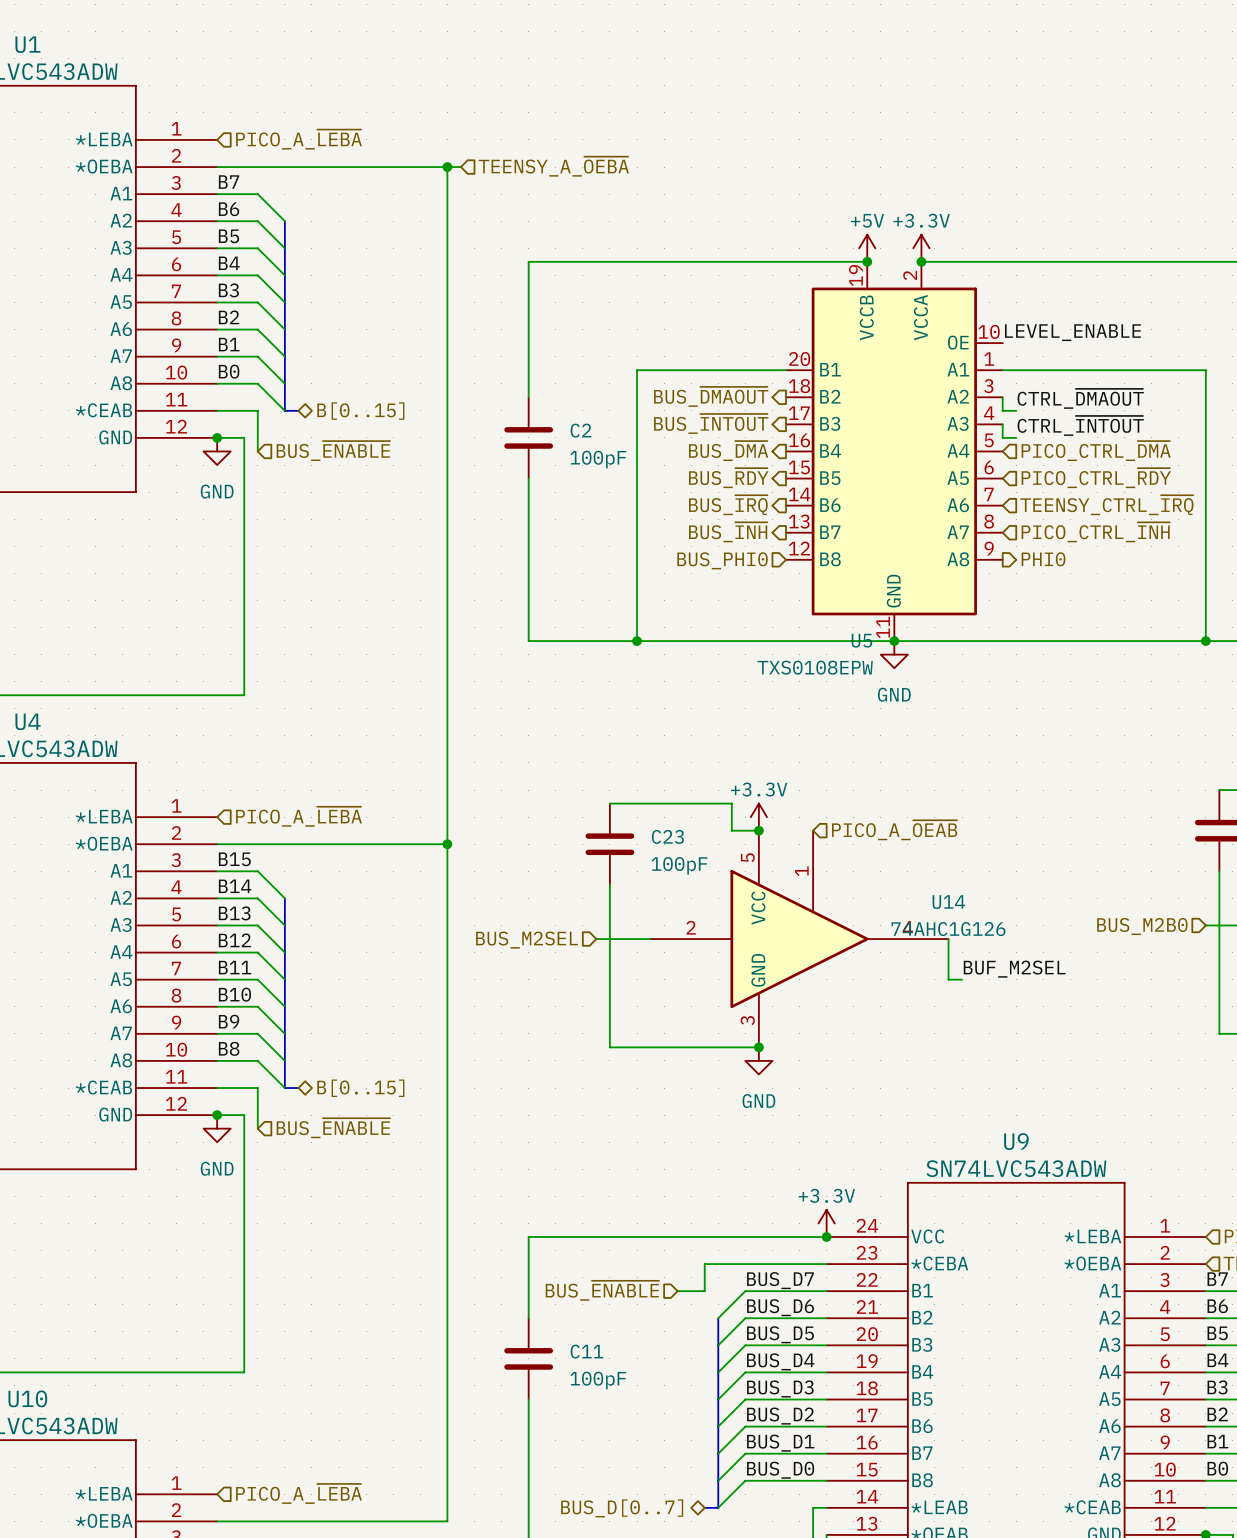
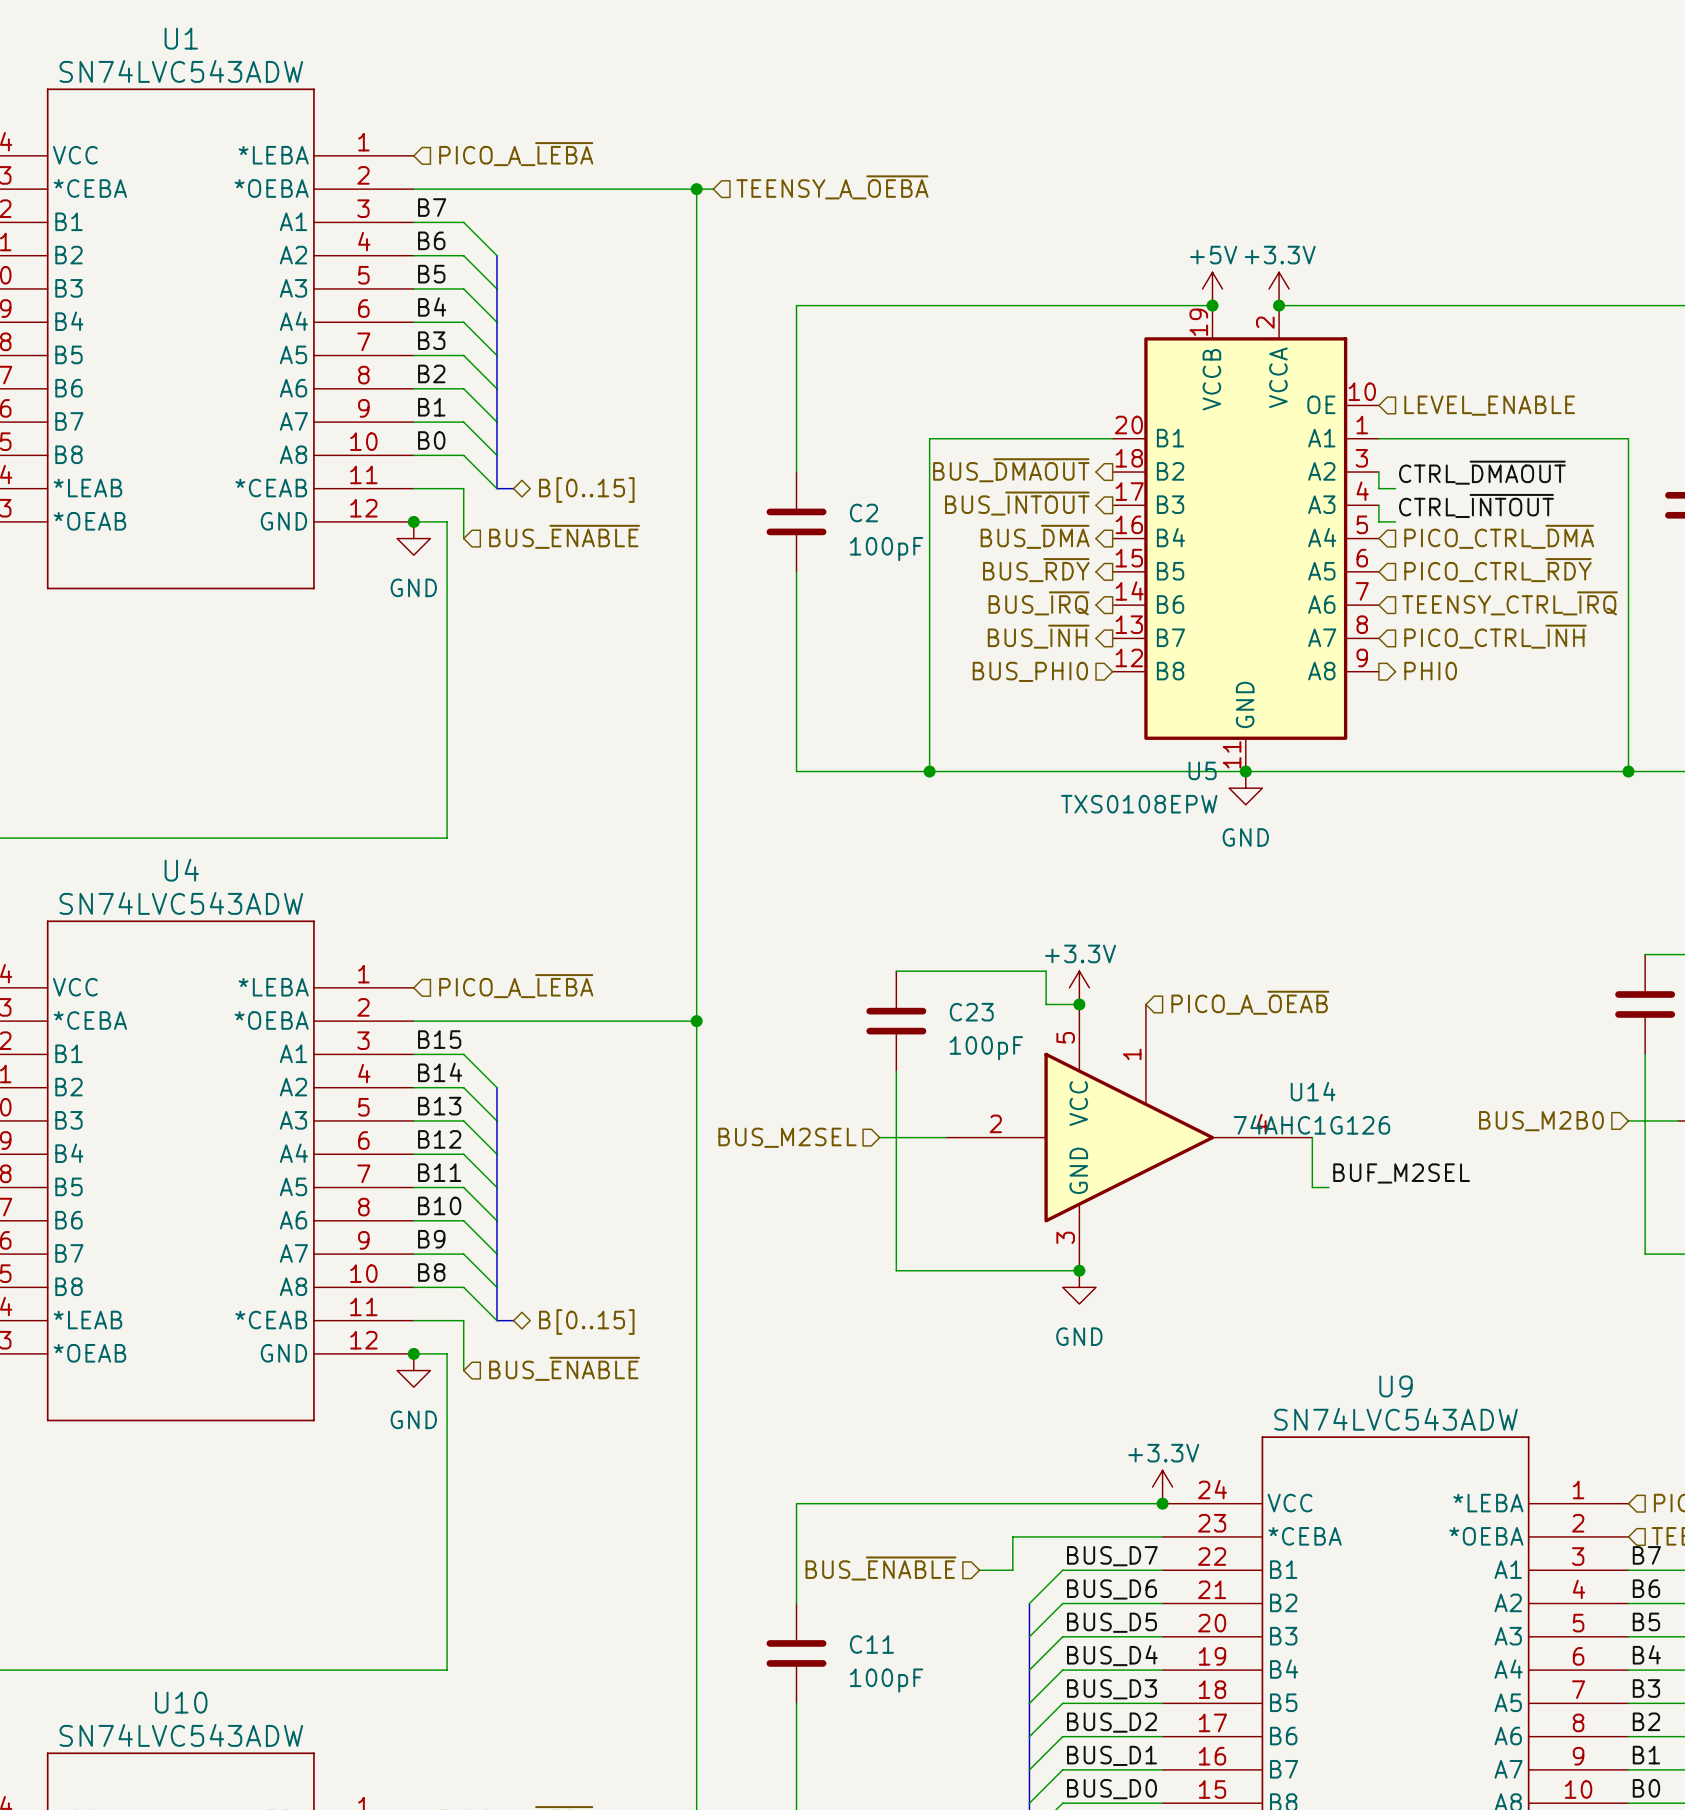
label: LEVEL_ENABLE (1072, 332) -> none
hierarchical label: none -> LEVEL_ENABLE (1489, 405)

